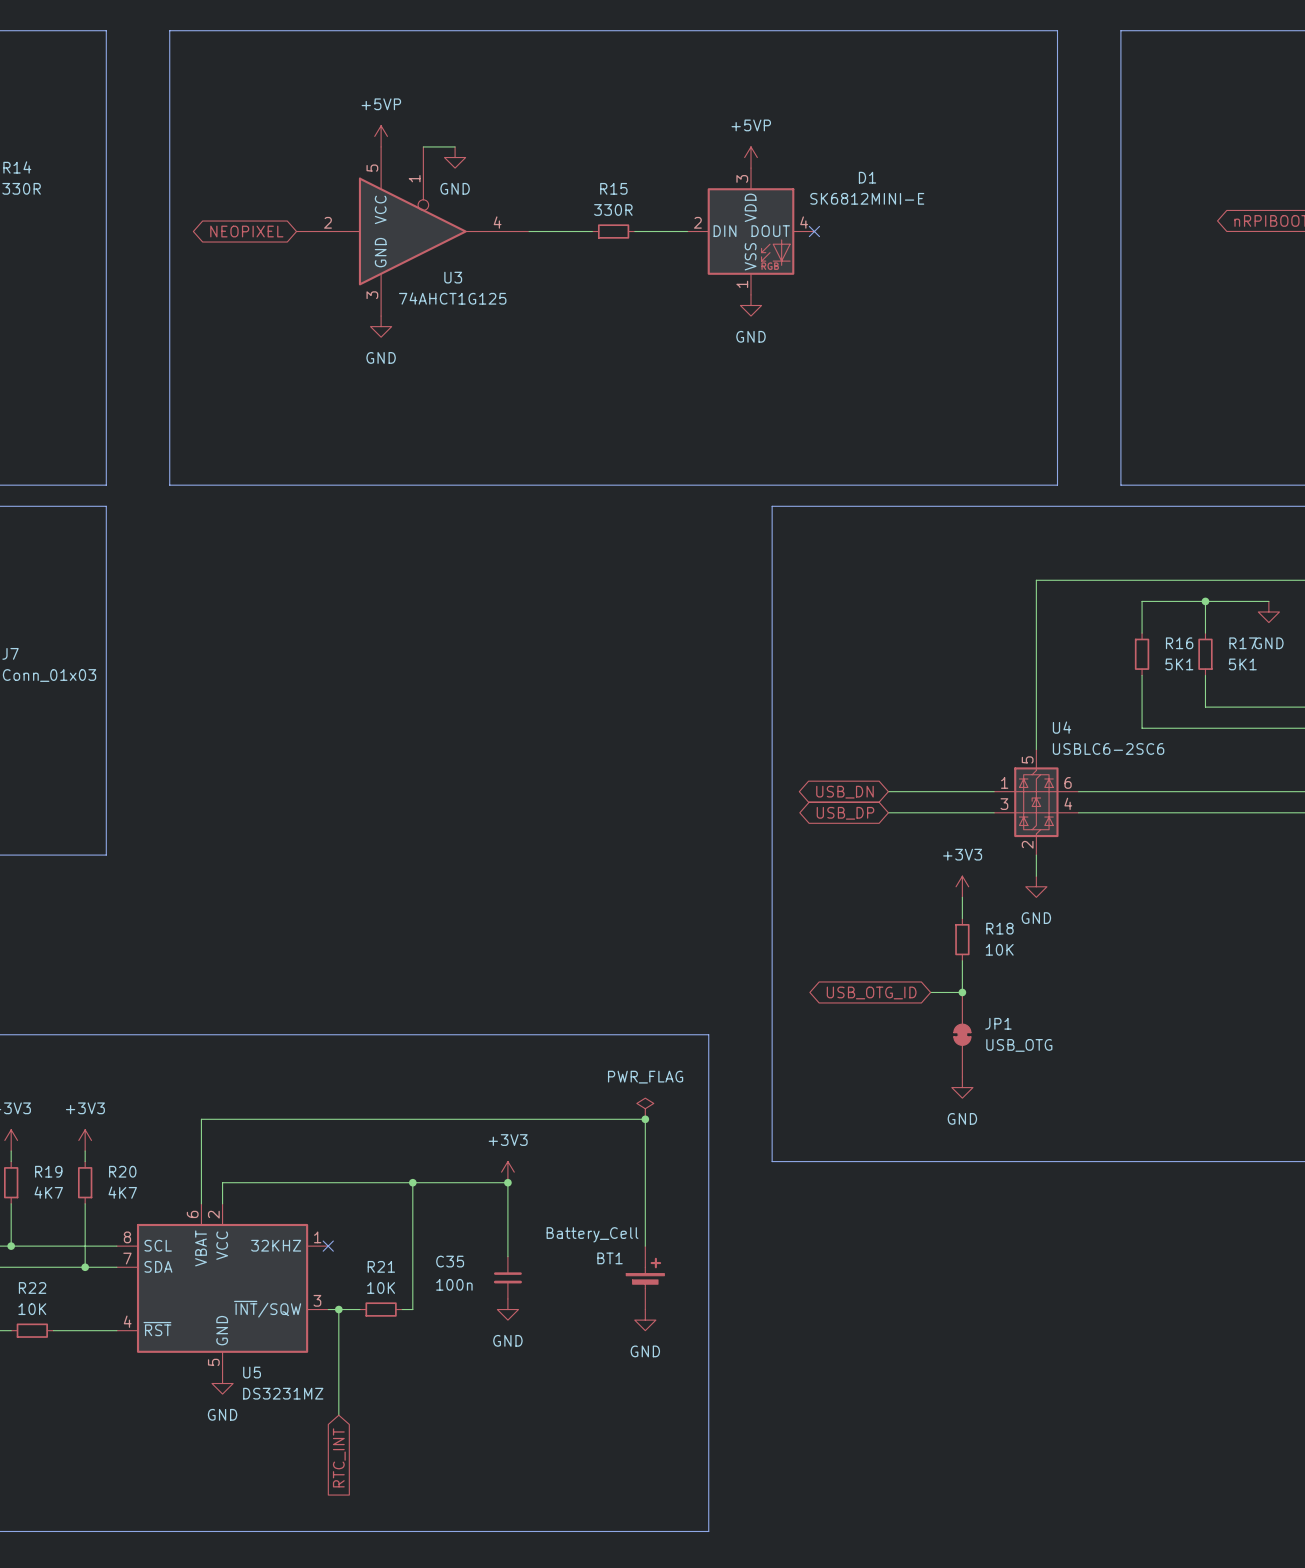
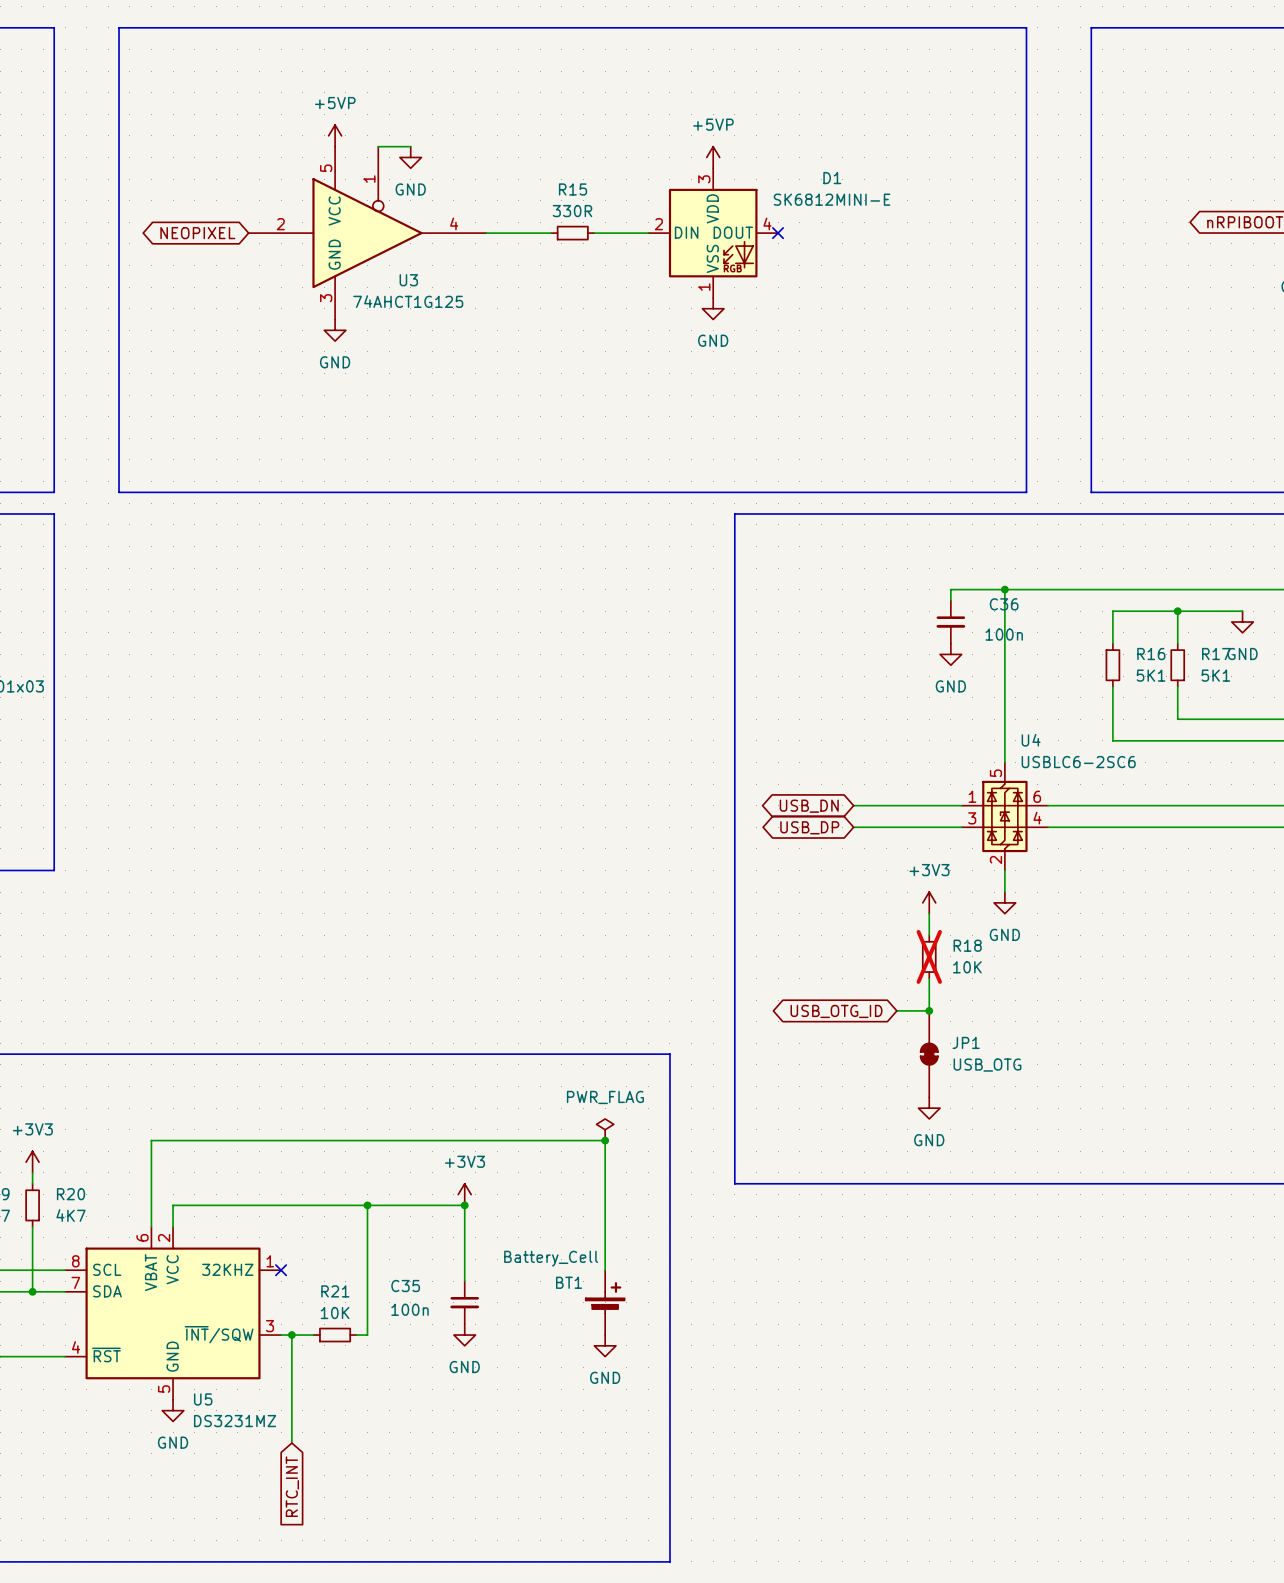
wire: none -> (1004, 589) (950, 589) (950, 600)
junction: none -> (1004, 589)
C36: none -> 100n (950, 622)
power symbol: none -> GND (950, 654)
R18 do-not-place cross: none -> (929, 956)

